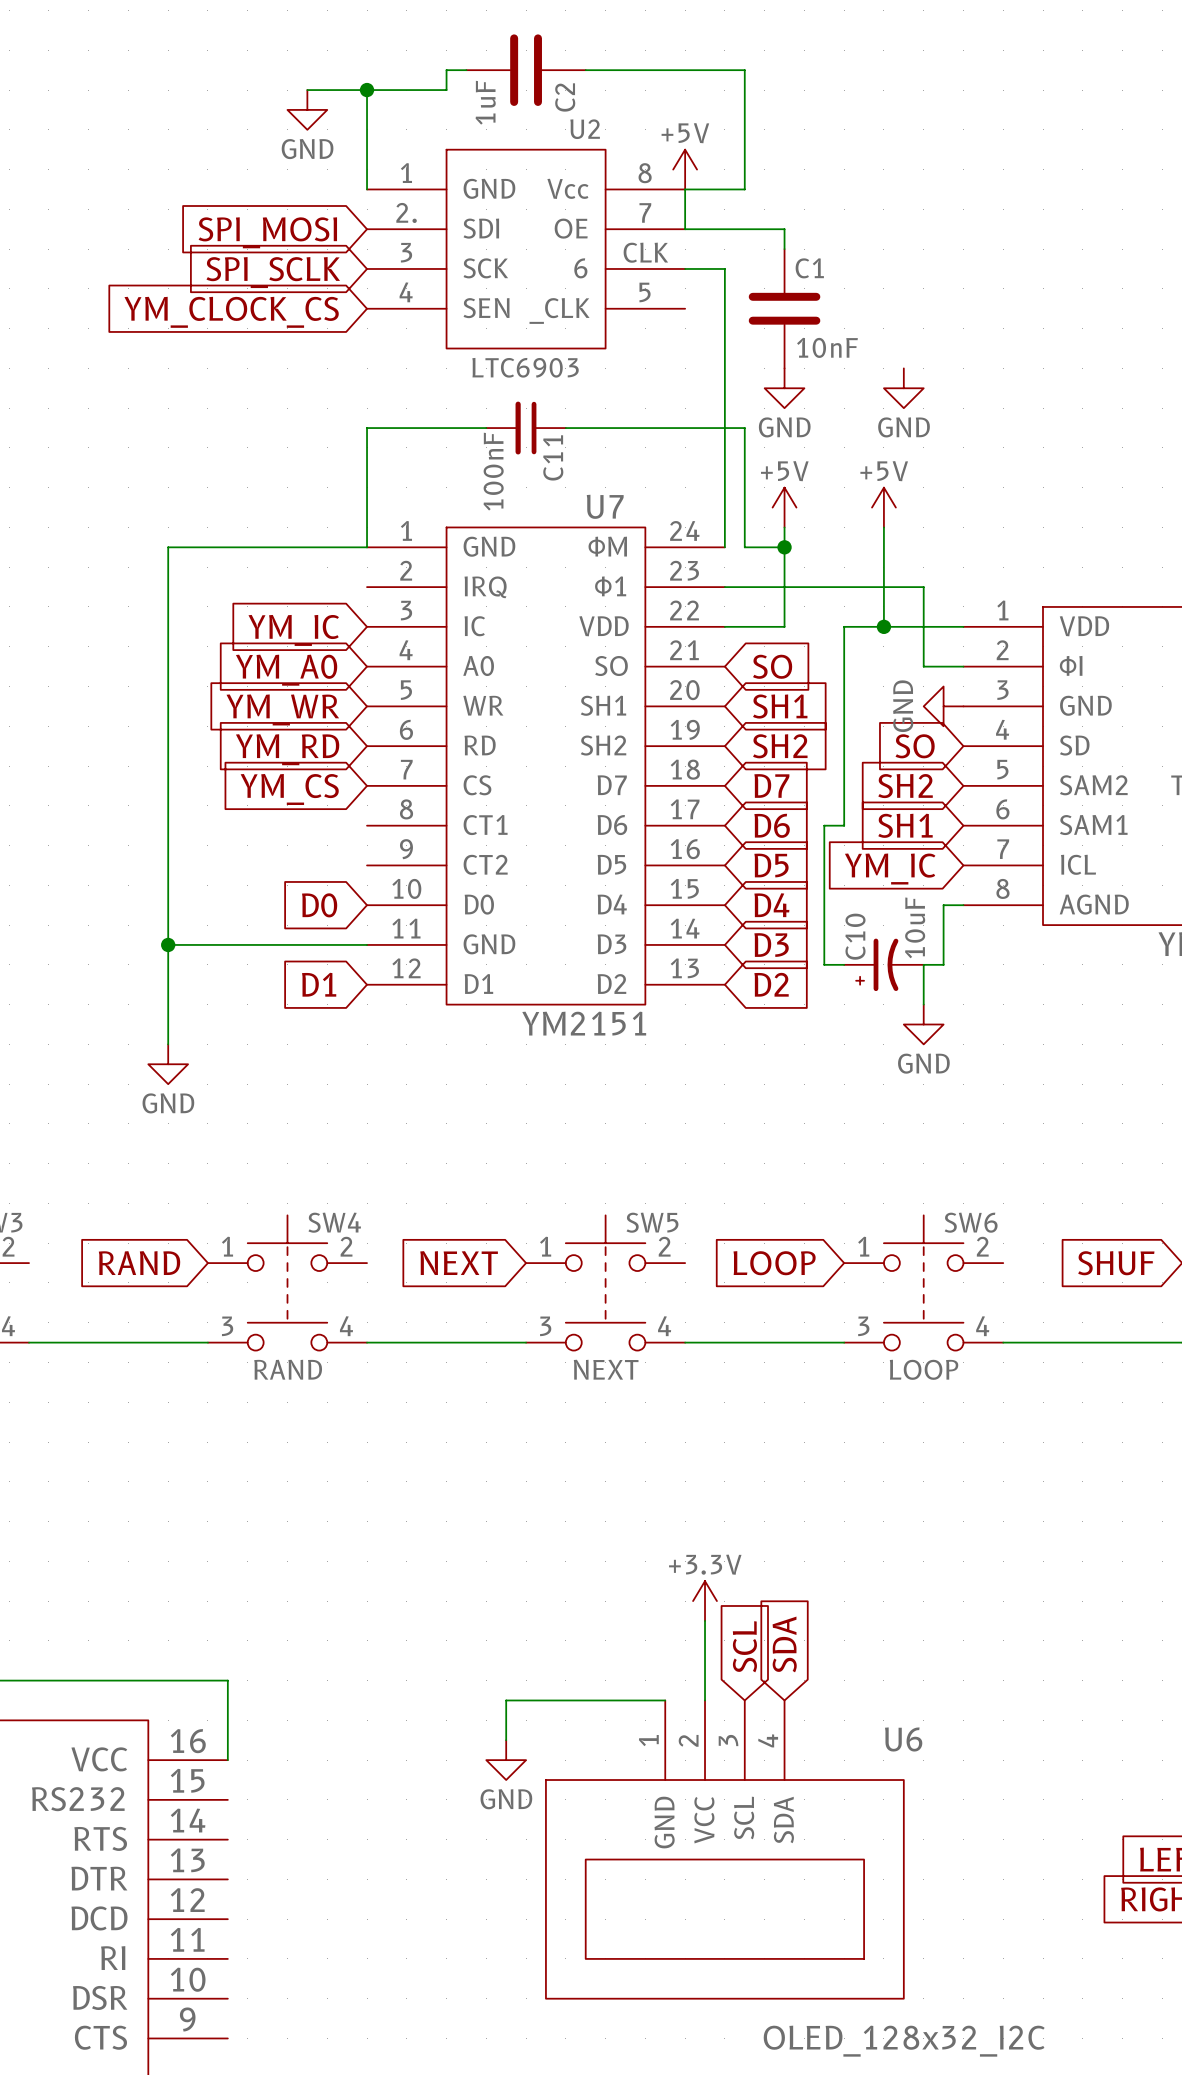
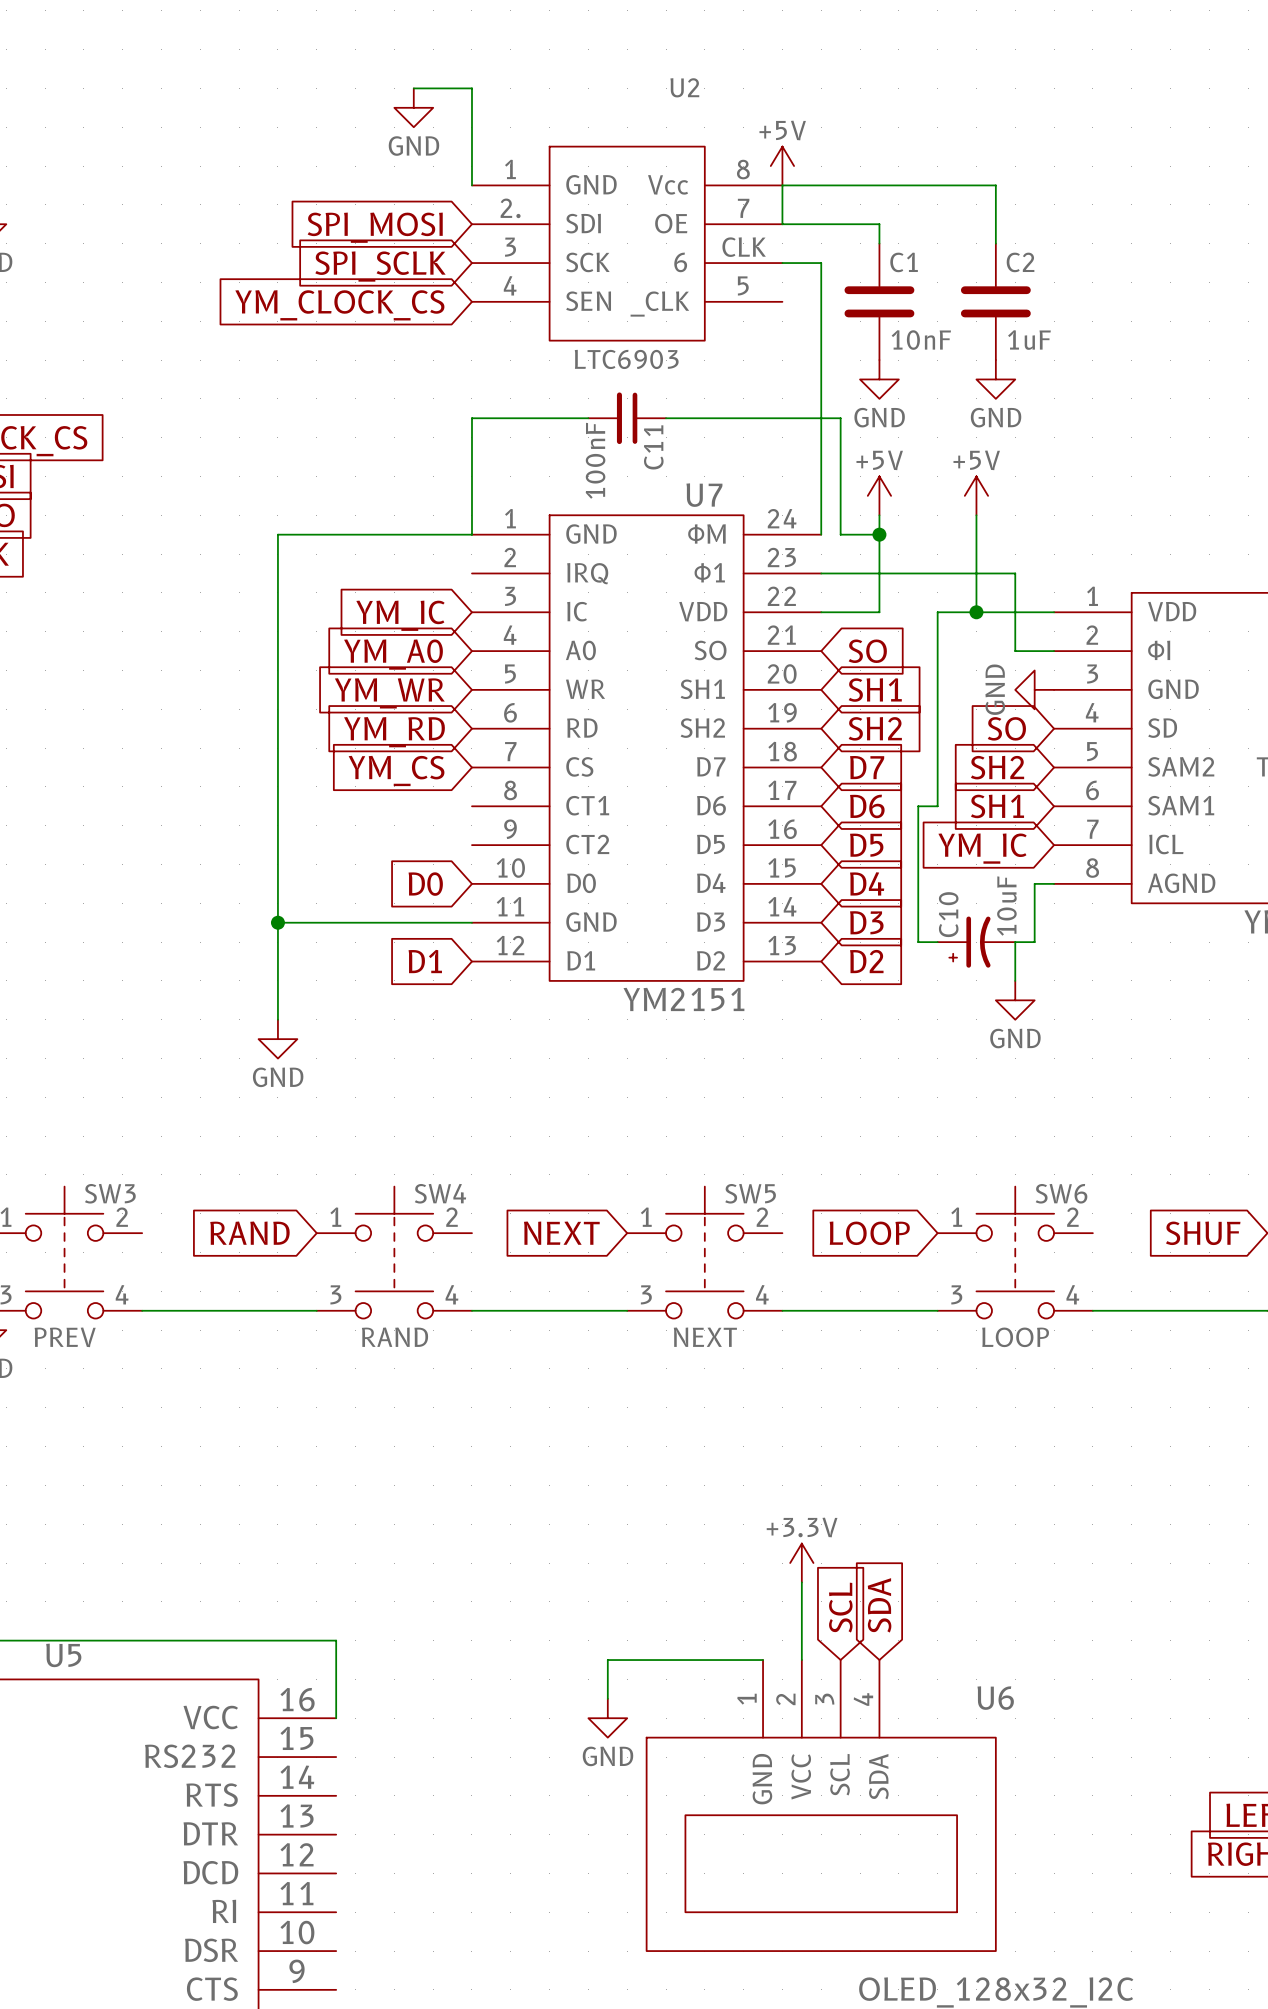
wire: (466, 70) (446, 70) (446, 90) (367, 90) -> none
C2 rotation: 0° (526, 70) -> 90° clockwise (995, 301)
C2 position: (526, 70) -> (995, 301)
wire: (585, 70) (744, 70) (744, 189) -> (995, 243) (995, 185) (840, 185)
junction: (367, 90) -> none
C2 name position: C2 (565, 97) -> C2 (1020, 262)
C2 value position: 1uF (485, 102) -> 1uF (1029, 340)
U2 name position: U2 (585, 129) -> U2 (684, 87)

